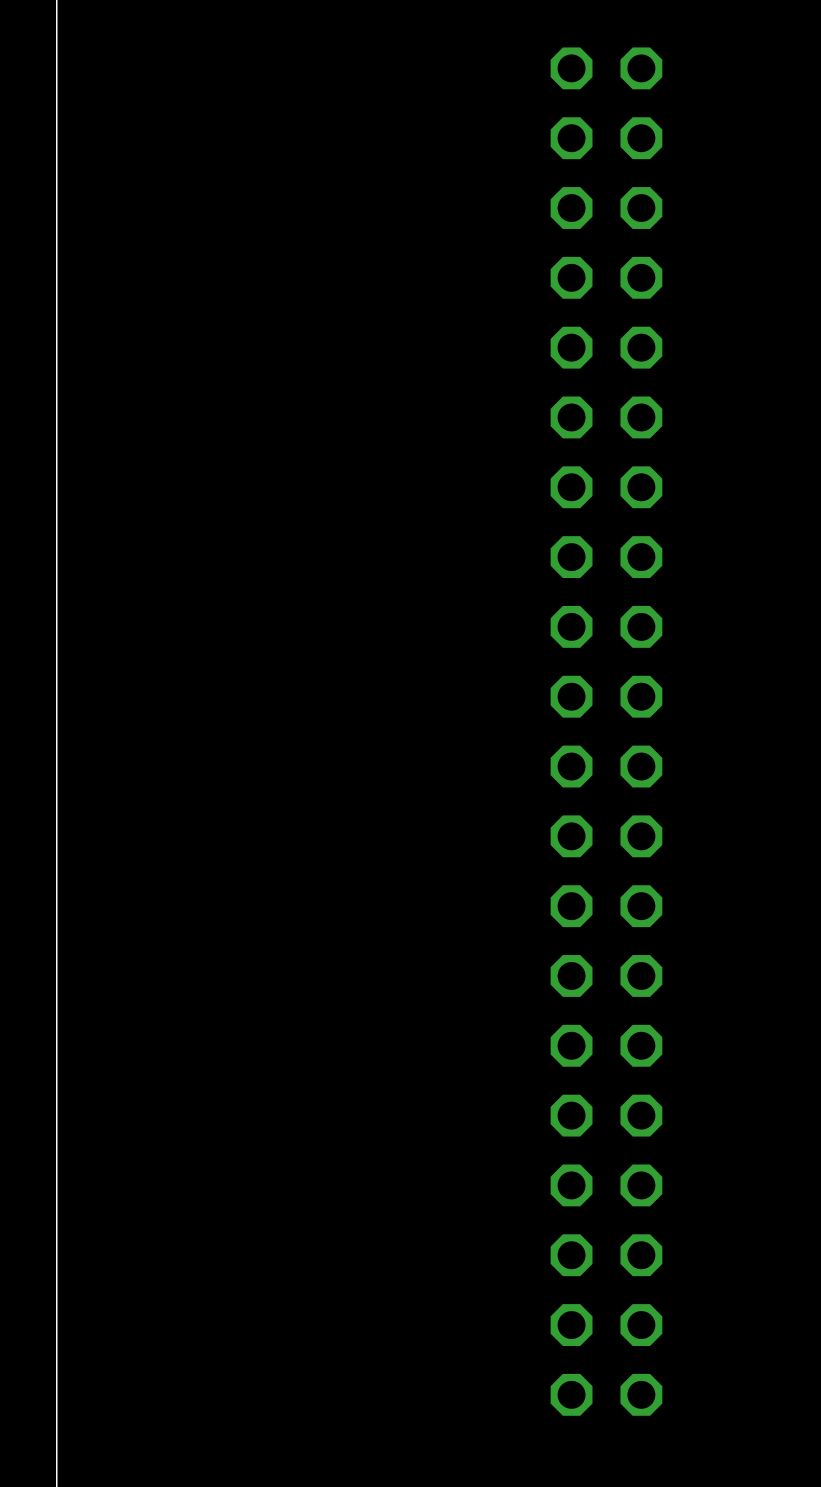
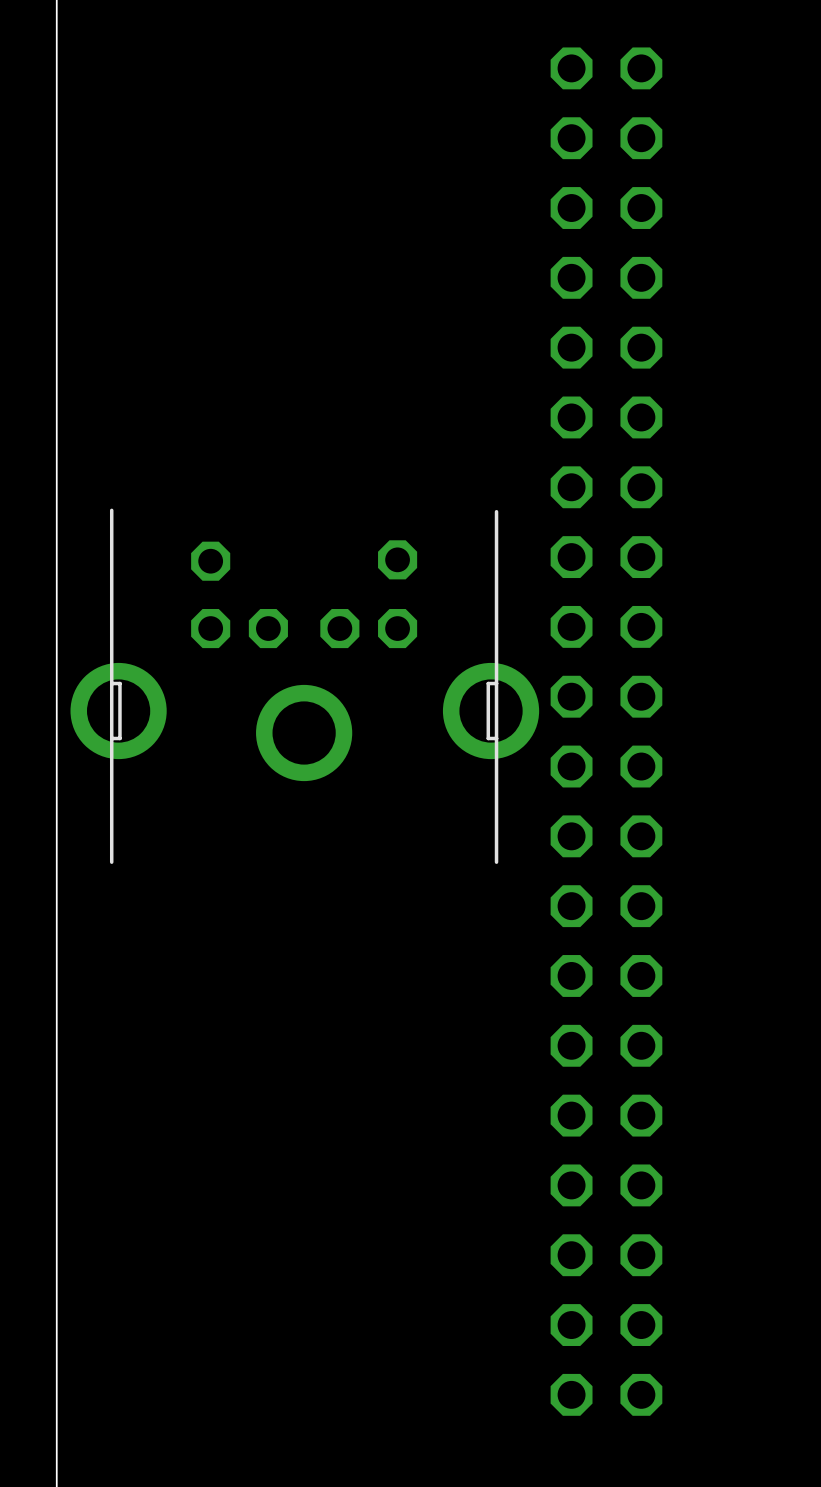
part: none -> (304, 686)

